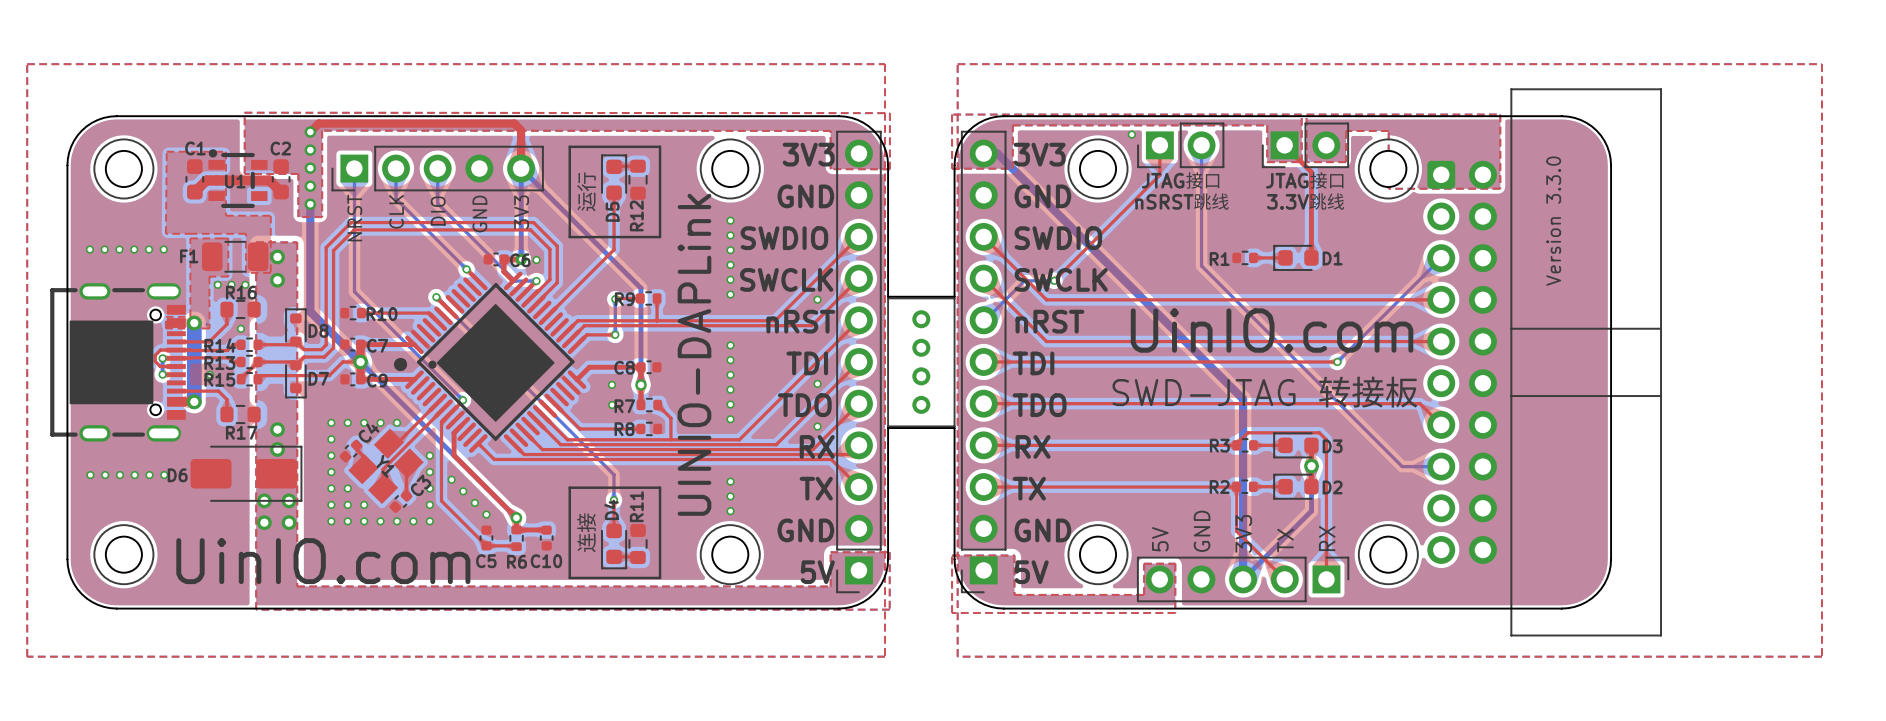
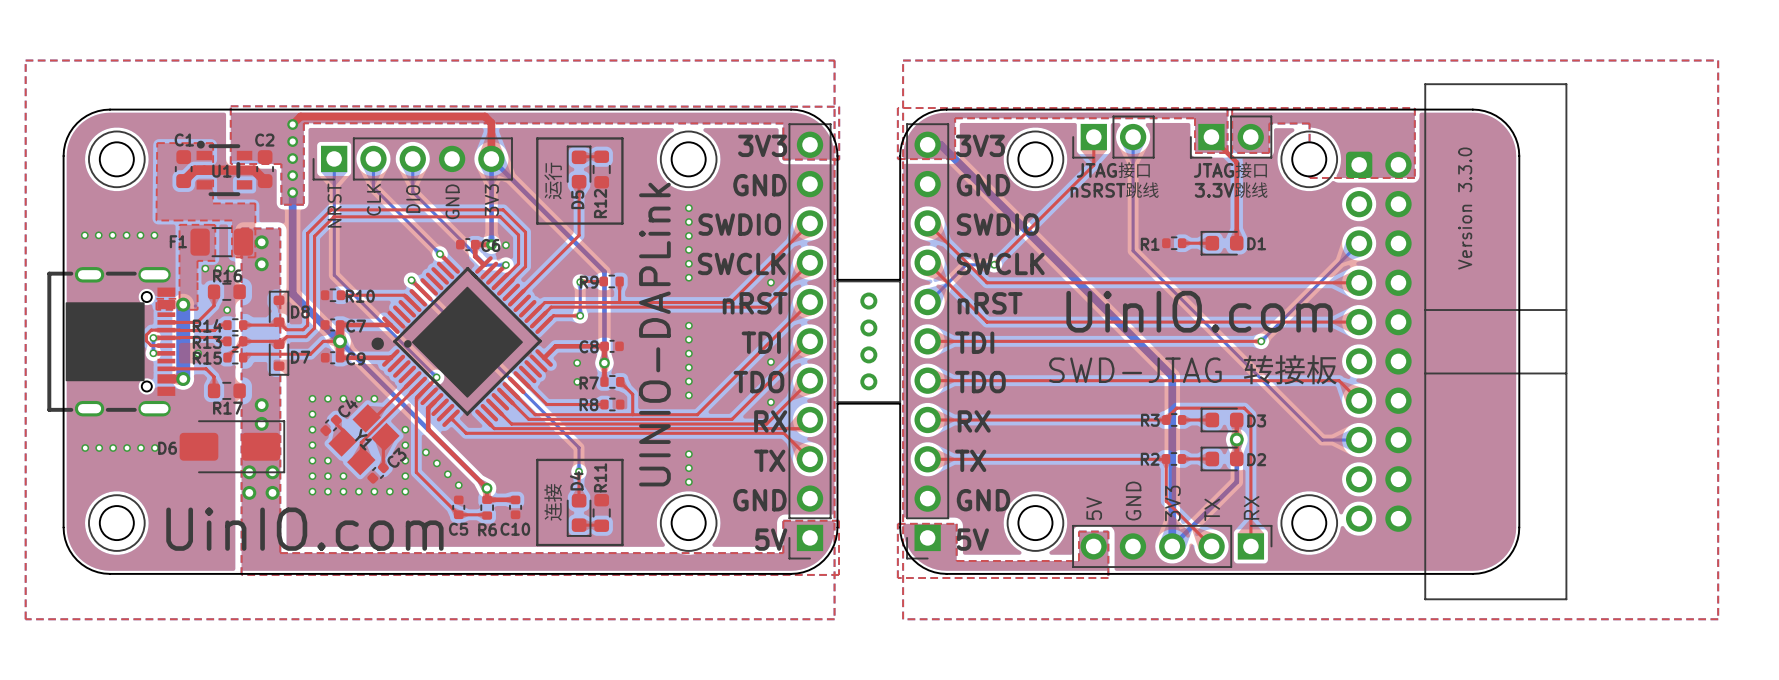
via: (1131, 134) -> none

